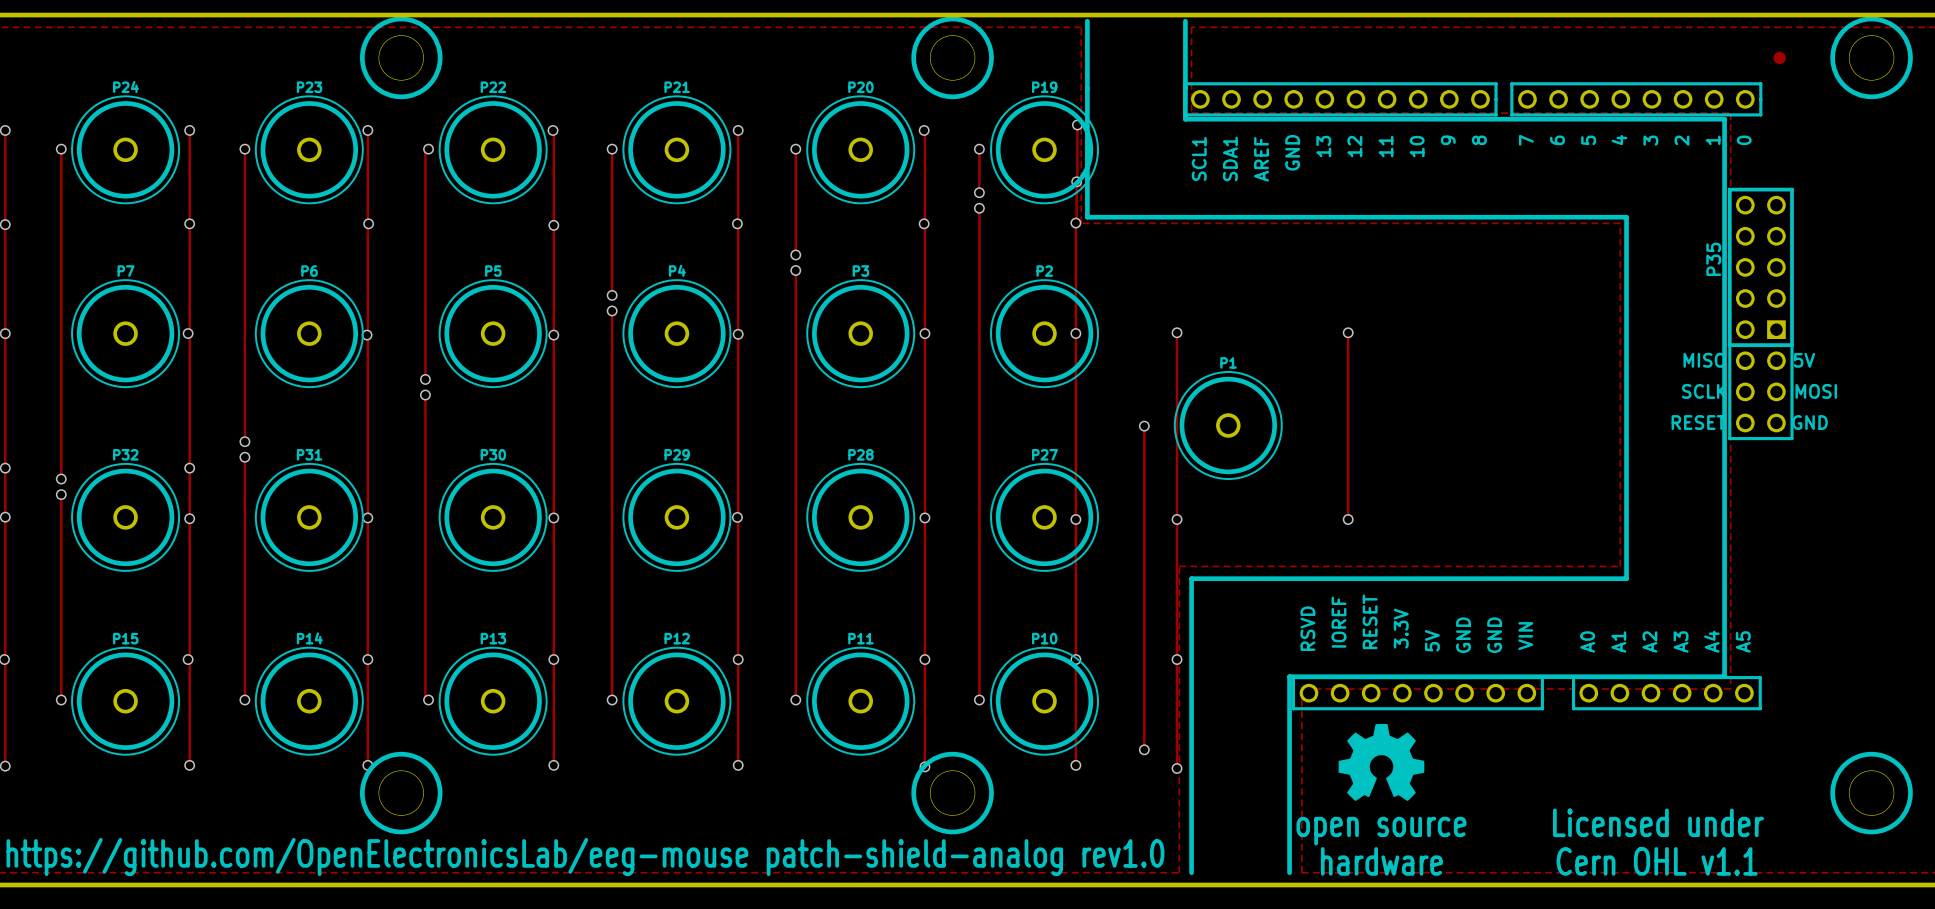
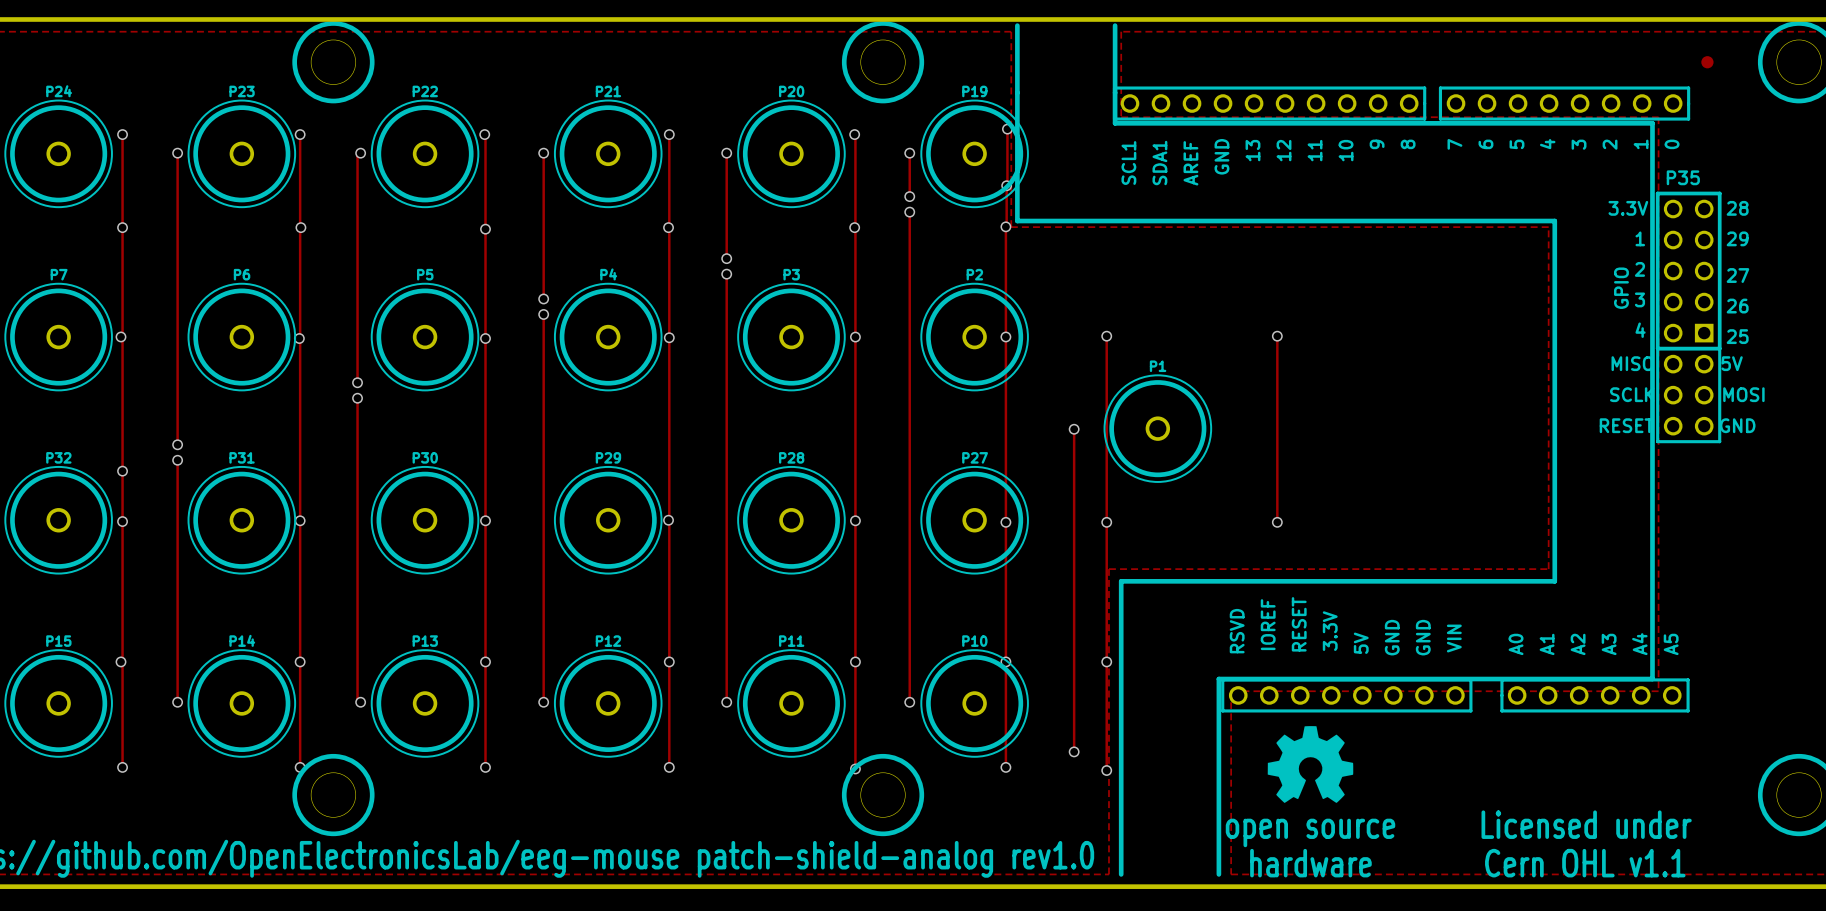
text: none -> 3.3V (1628, 208)
text: none -> 28 (1737, 208)
text: none -> 1 (1640, 238)
text: none -> 29 (1737, 238)
P35 name rotation: 0° (1713, 259) -> 90° clockwise (1683, 177)
P35 name position: P35 (1713, 259) -> P35 (1683, 177)
text: none -> 2 (1639, 269)
text: none -> 27 (1737, 275)
text: none -> GPIO (1621, 288)
text: none -> 3 (1639, 299)
text: none -> 26 (1737, 306)
text: none -> 4 (1640, 330)
text: none -> 25 (1737, 336)

